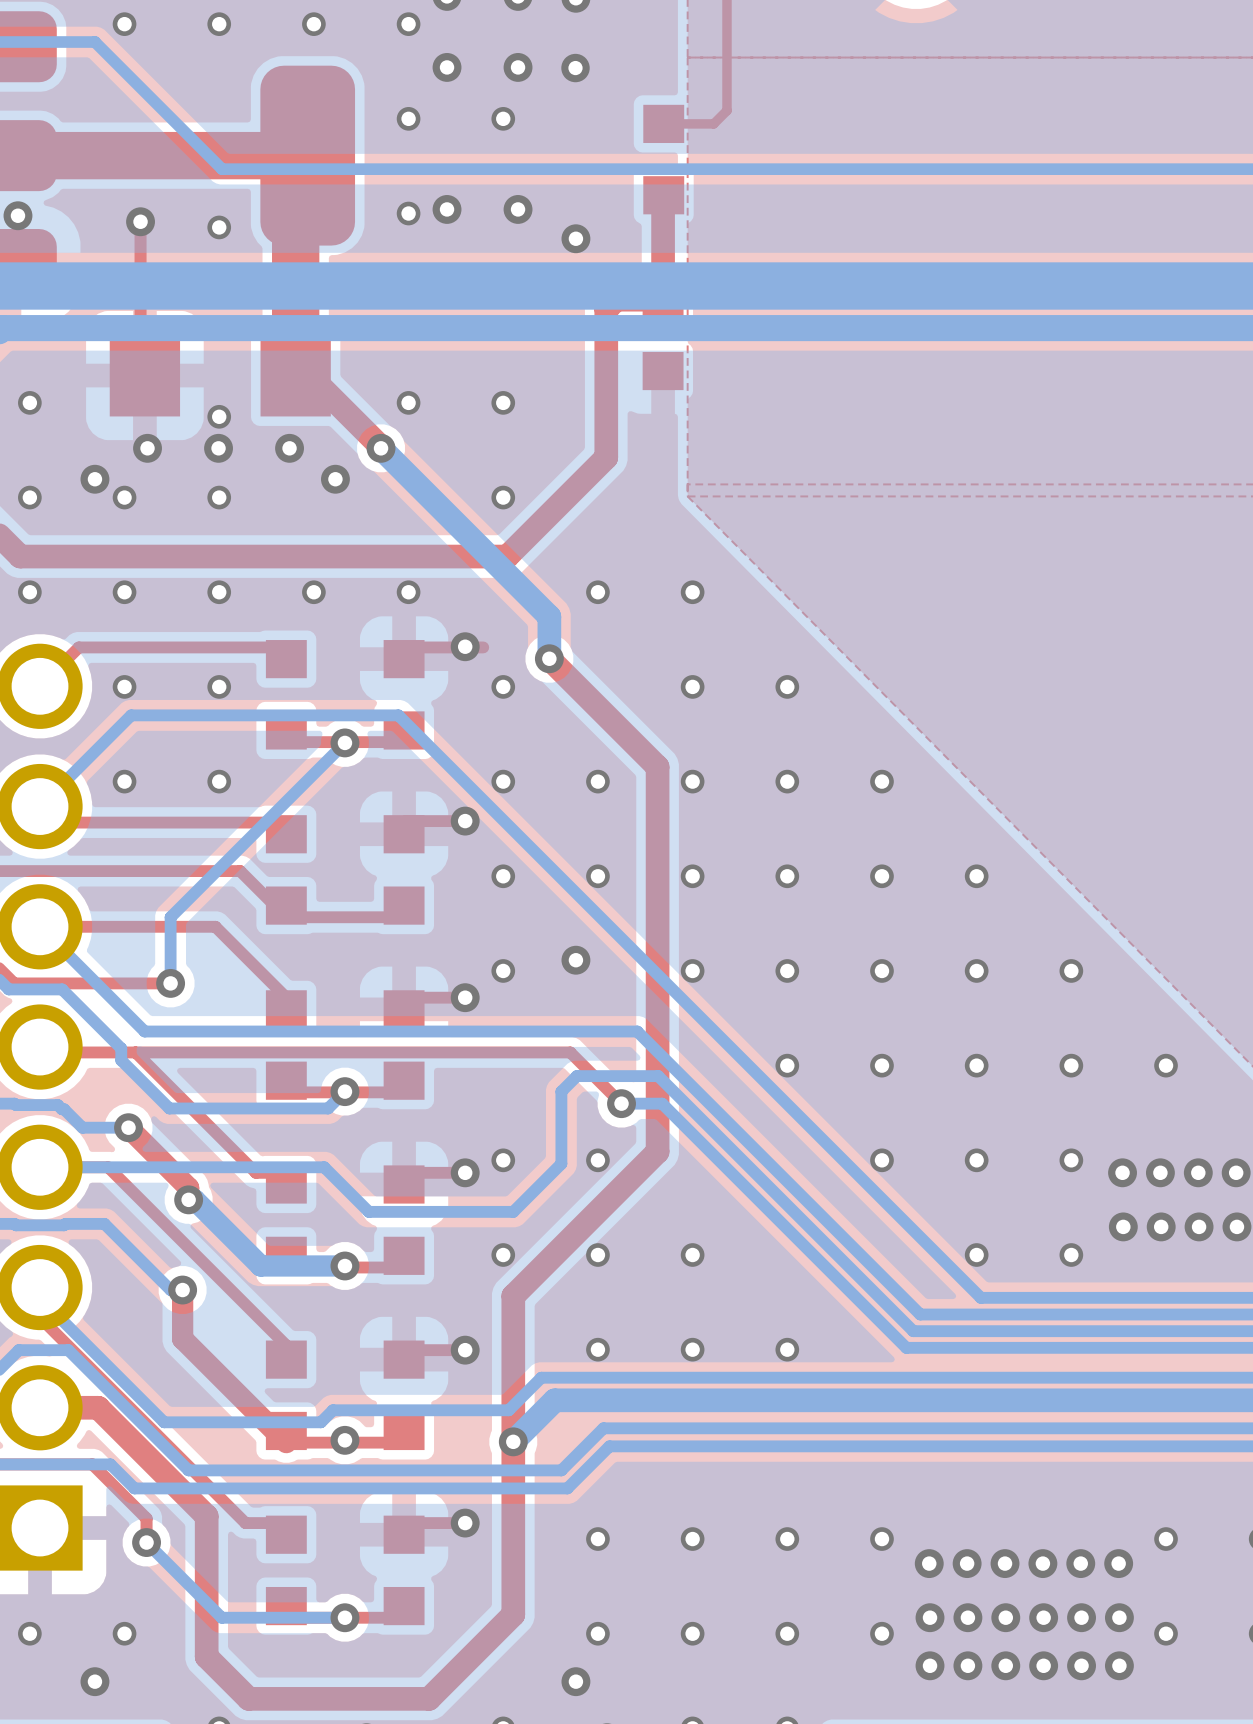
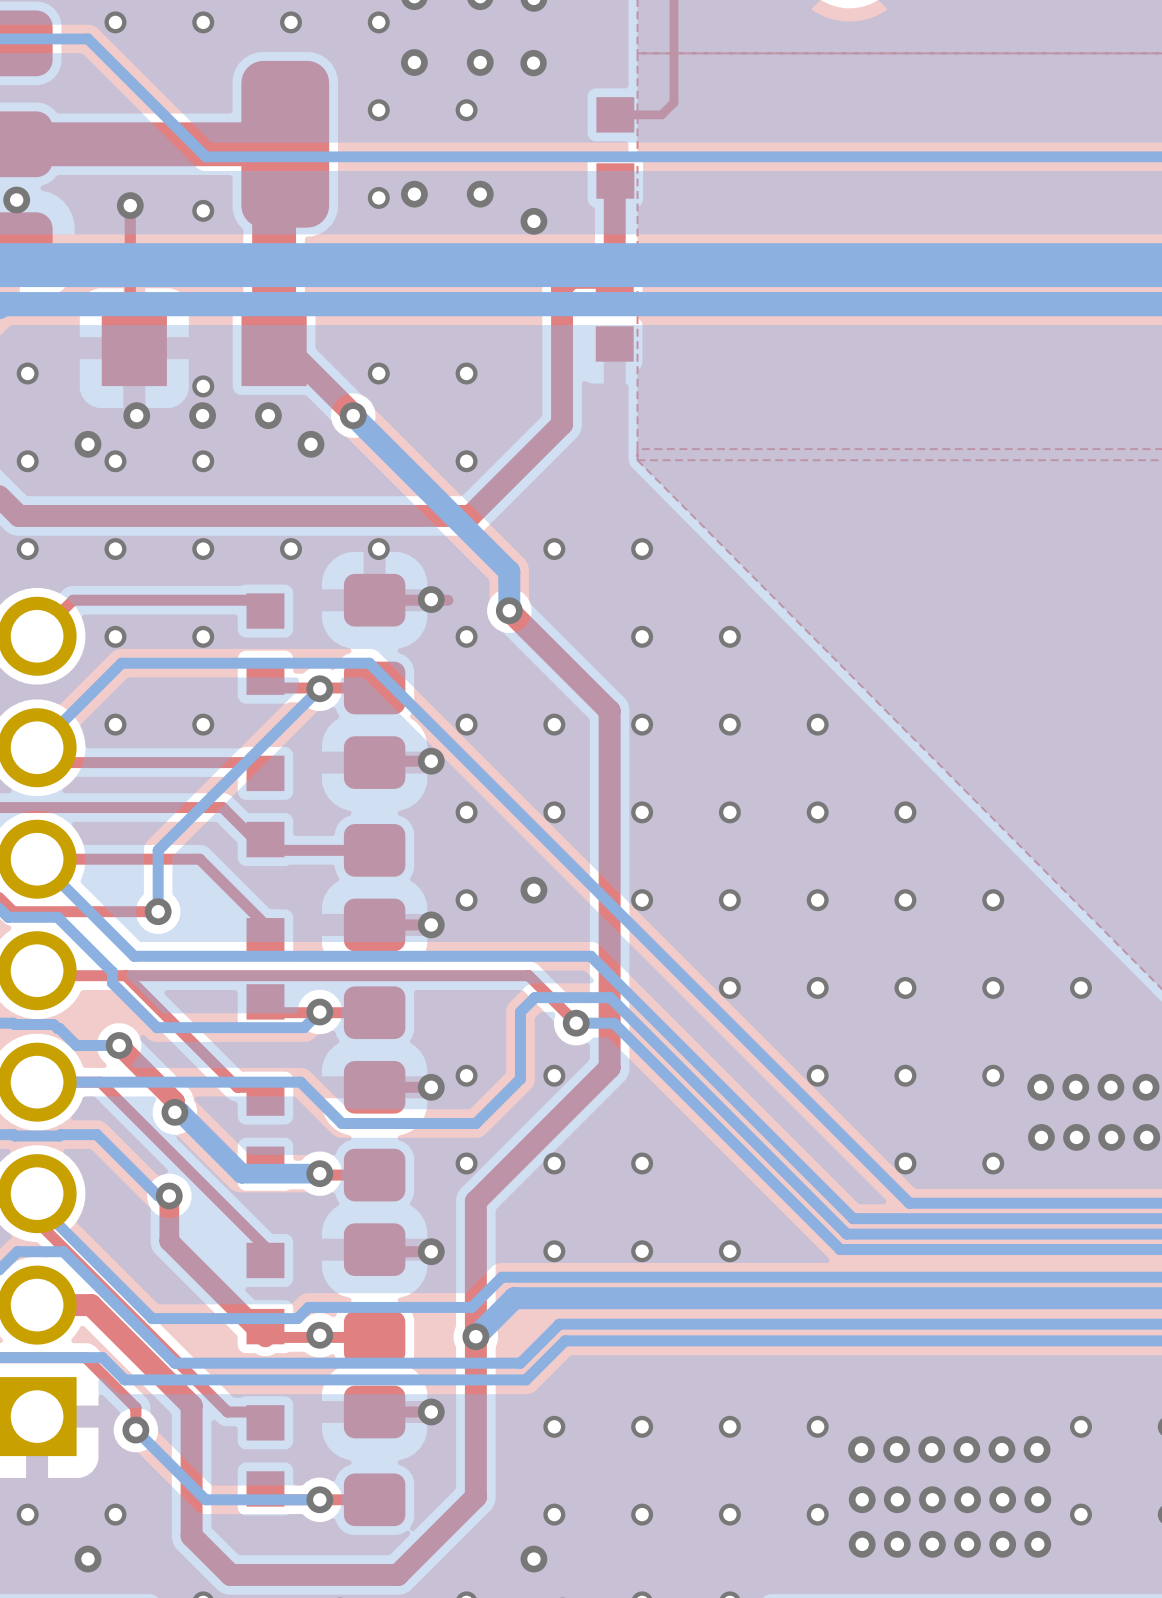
part footprint: [383, 640, 425, 750] -> [343, 573, 406, 715]
part footprint: [383, 815, 425, 925] -> [343, 736, 406, 877]
part footprint: [383, 990, 425, 1100] -> [343, 898, 406, 1040]
part footprint: [383, 1165, 425, 1275] -> [343, 1060, 406, 1202]
part footprint: [383, 1340, 425, 1451] -> [343, 1223, 406, 1364]
part footprint: [383, 1515, 425, 1626] -> [343, 1385, 406, 1527]

